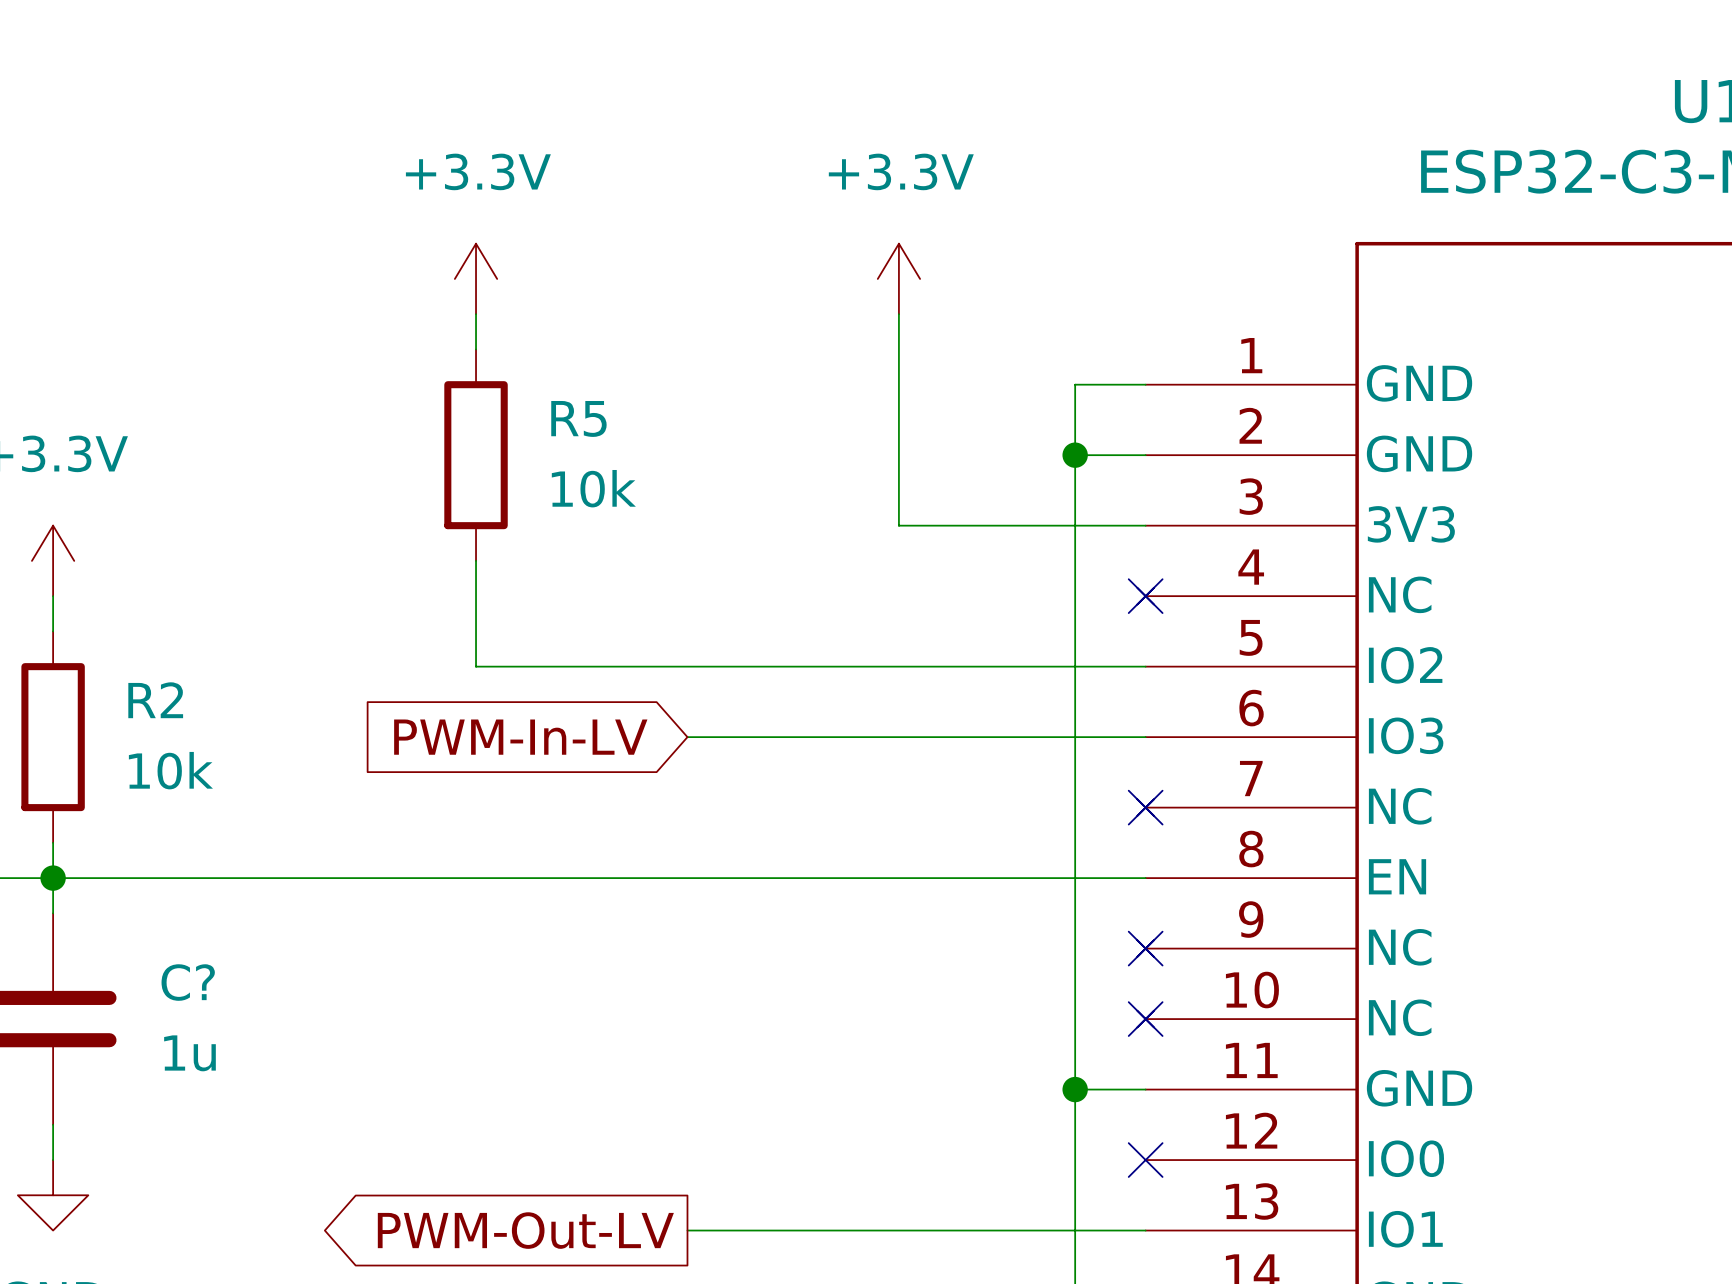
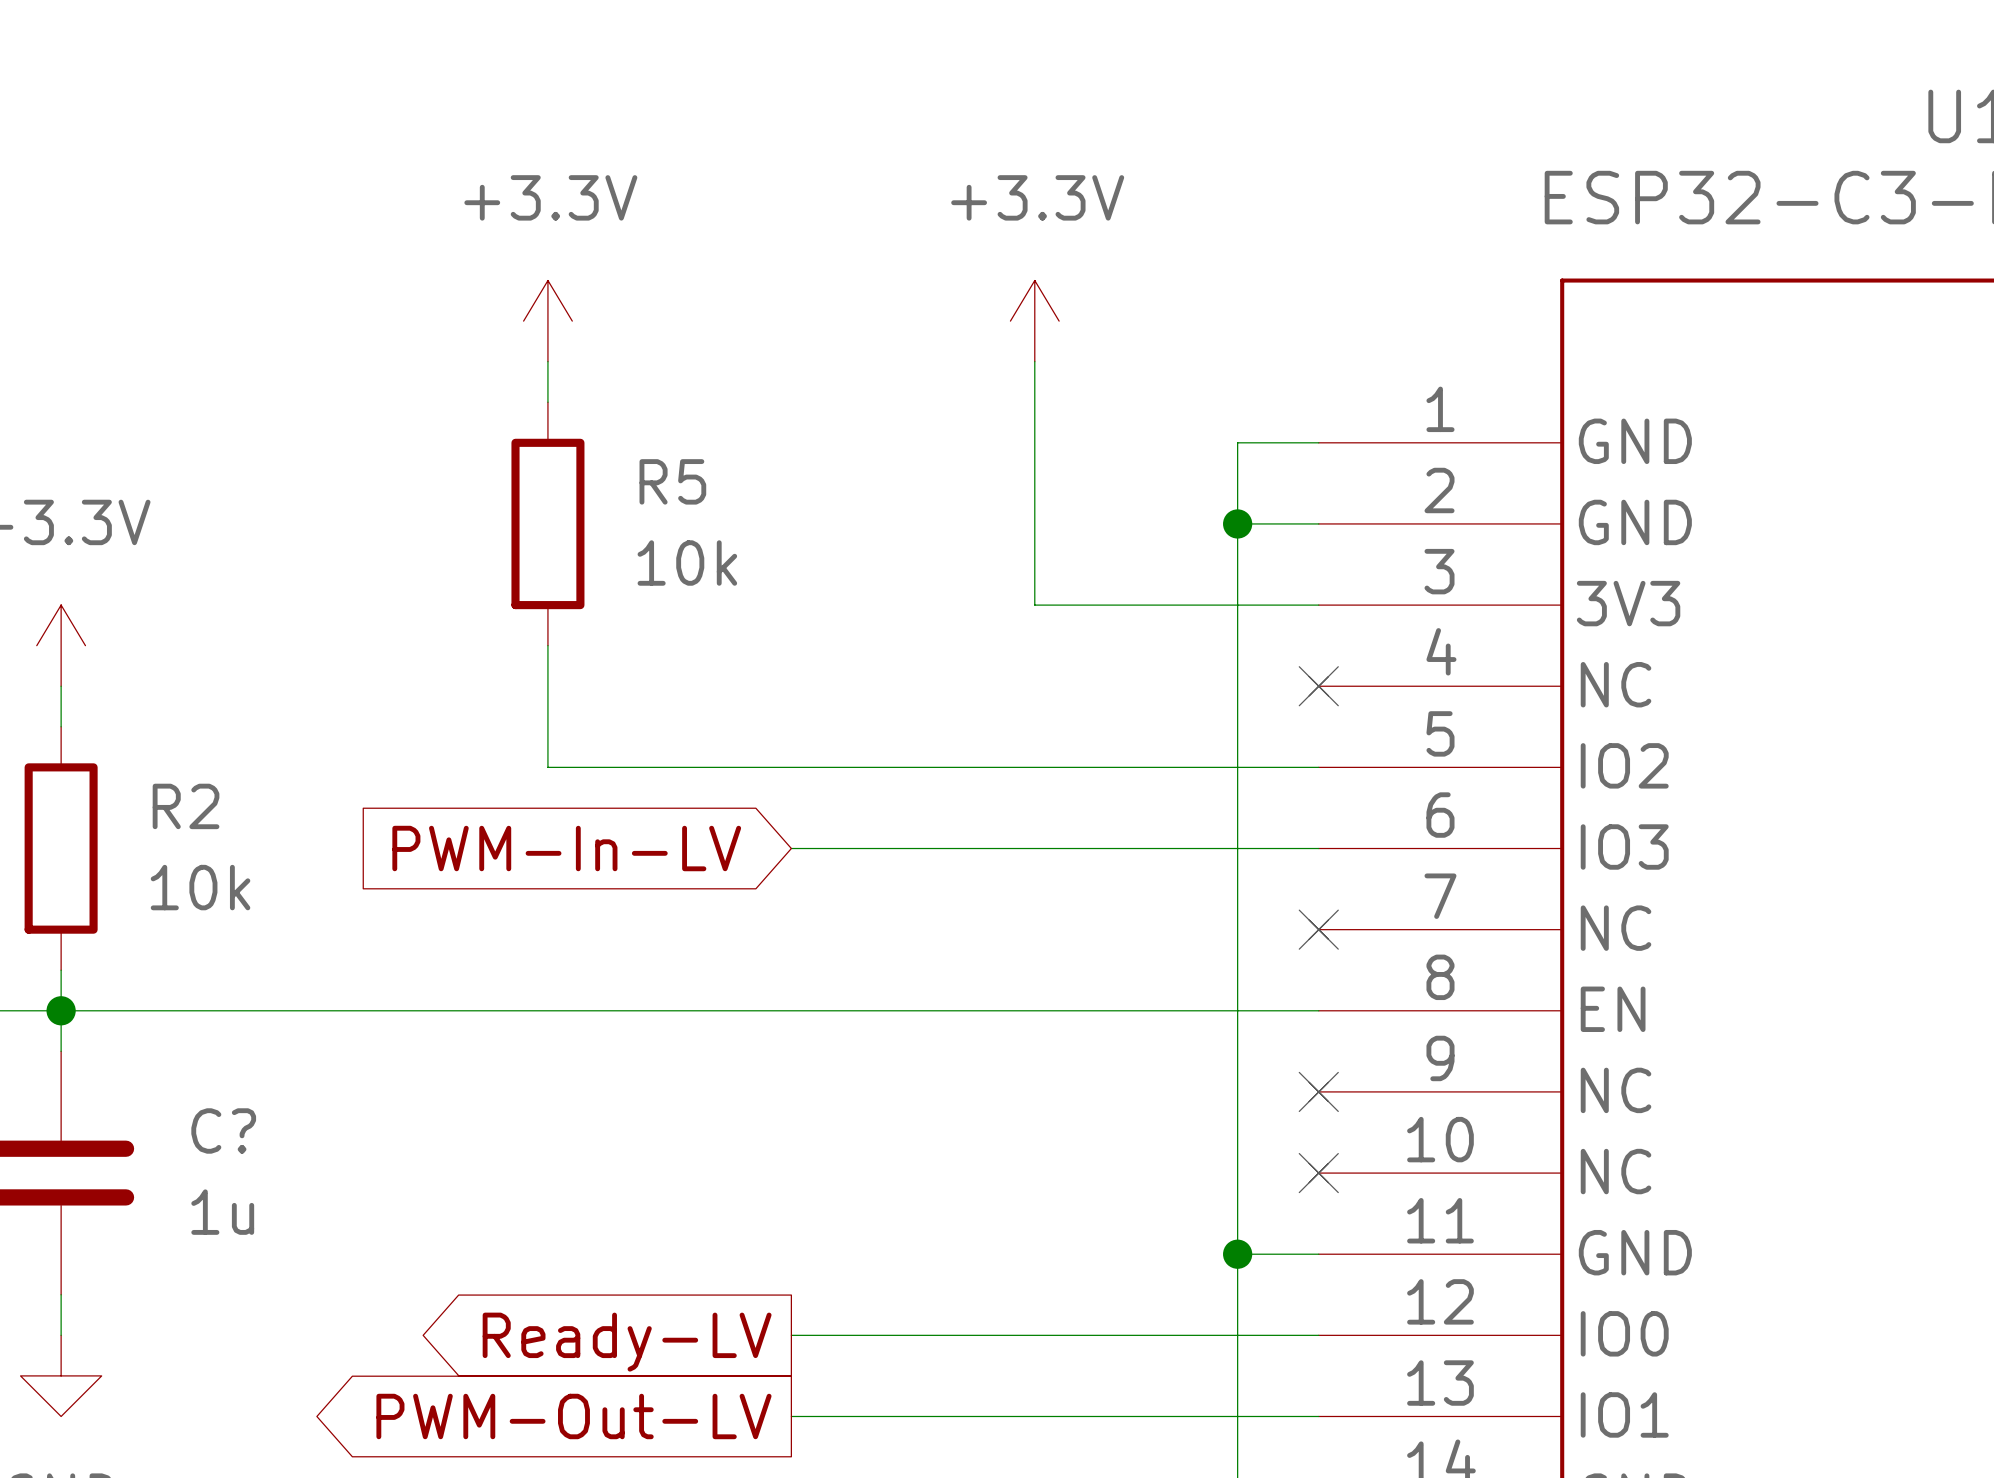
wire: none -> (791, 1335) (1318, 1335)
no-connect mark: (1145, 1160) -> none
global label: none -> Ready-LV (627, 1342)

